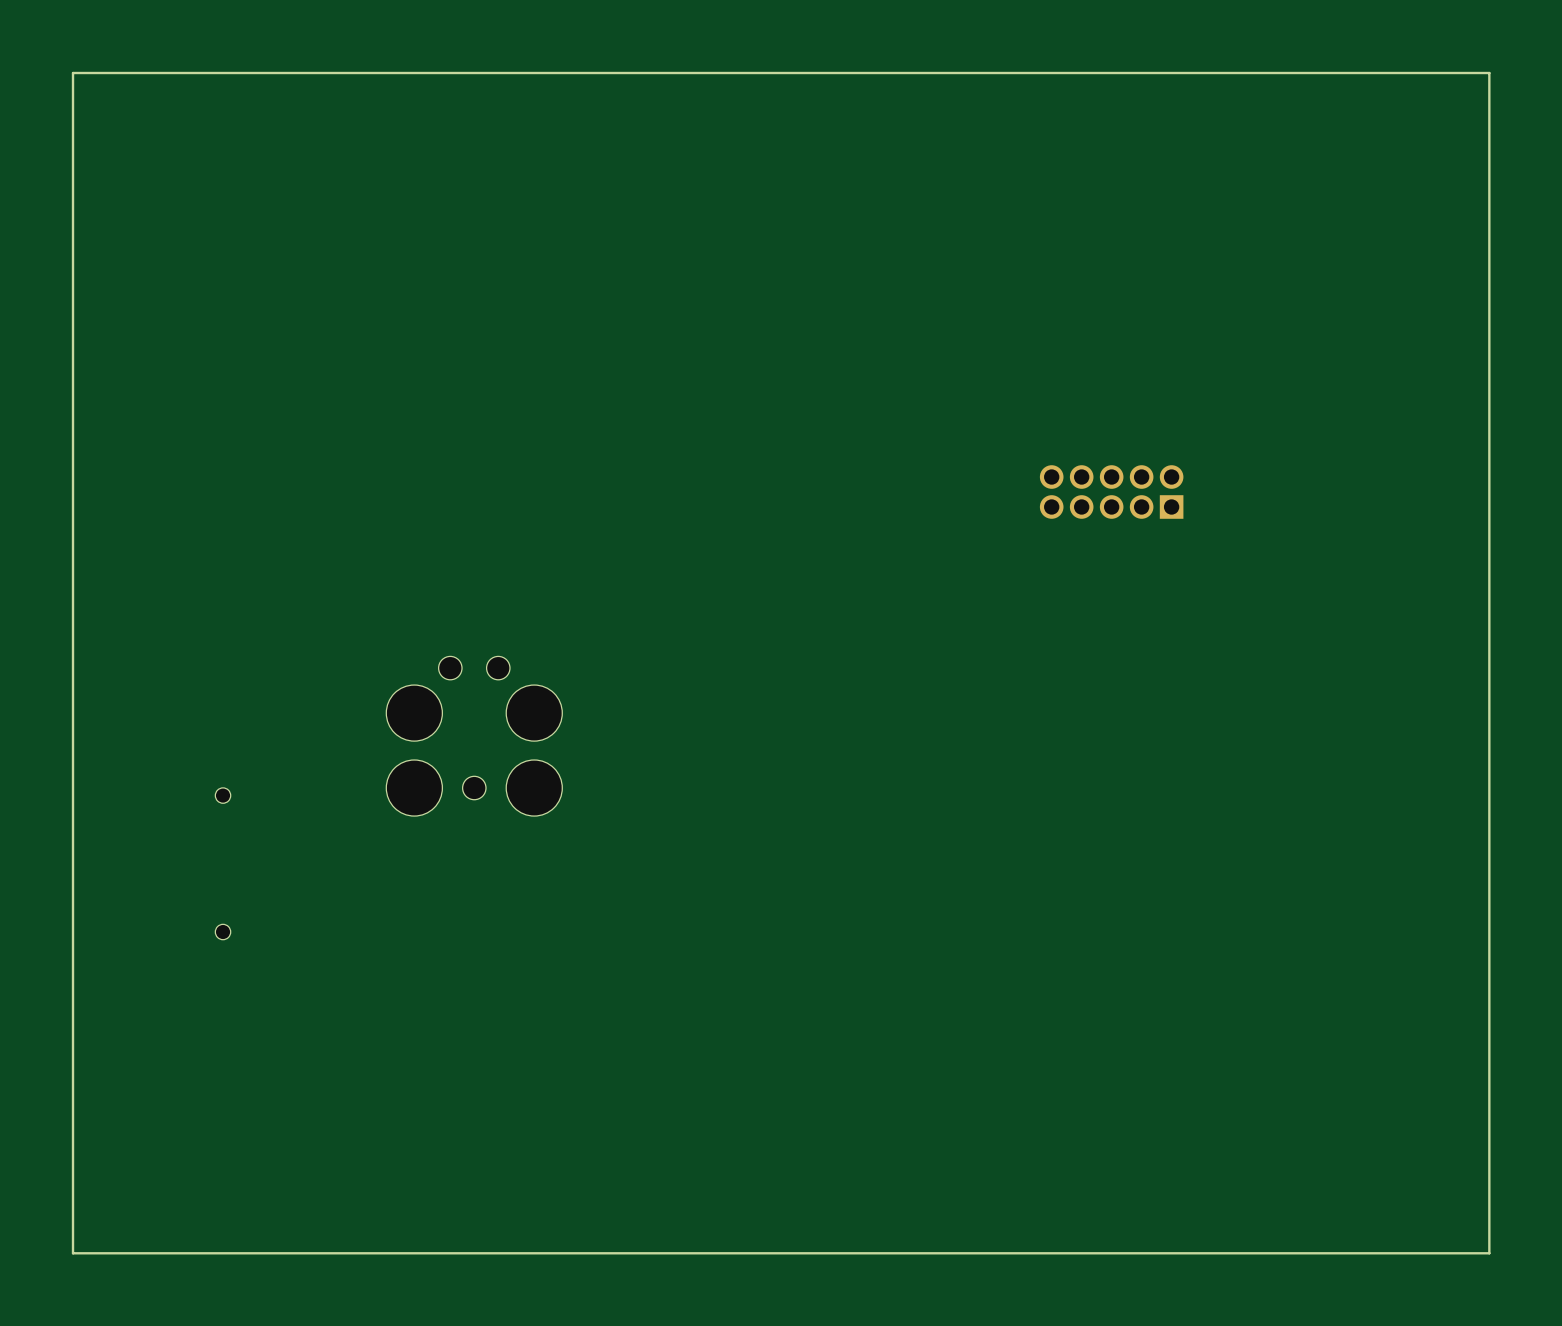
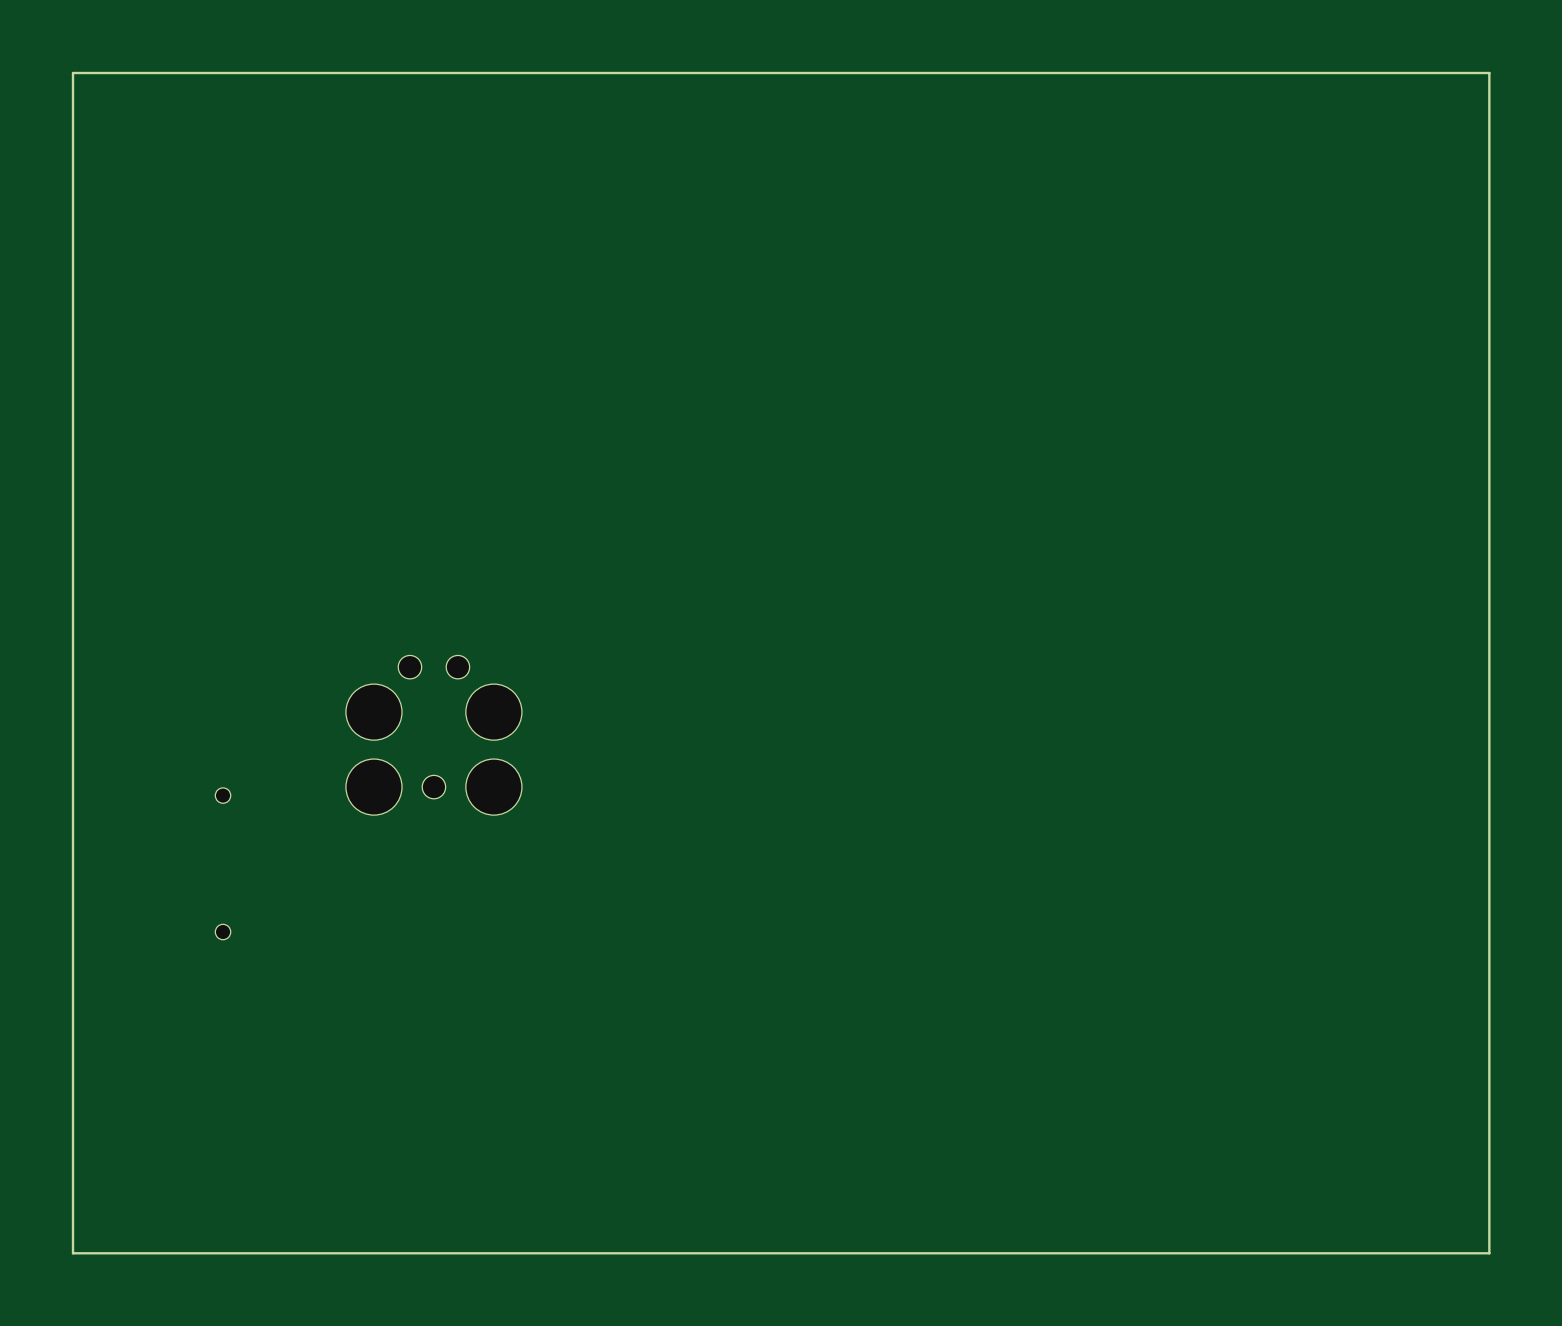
part: (1111, 492) -> none
part position: (474, 736) -> (433, 735)

